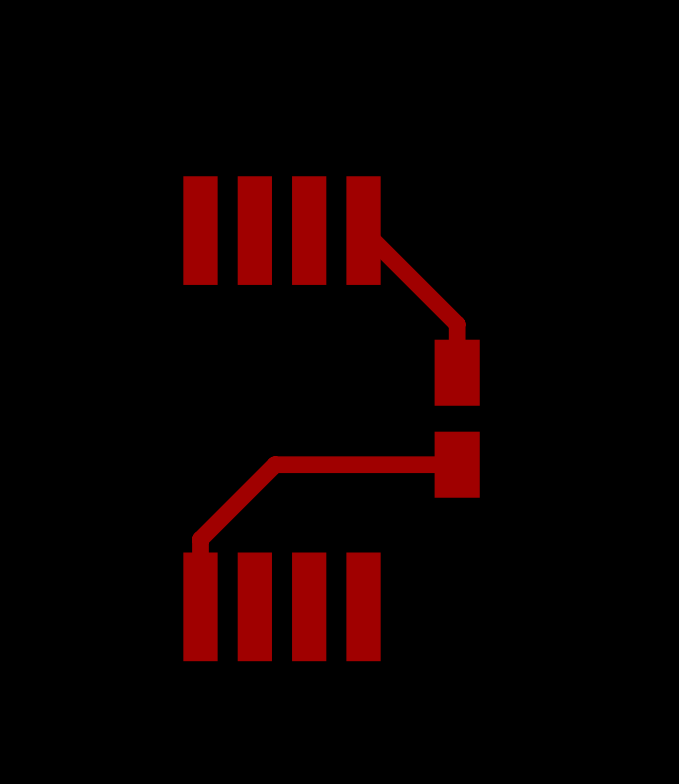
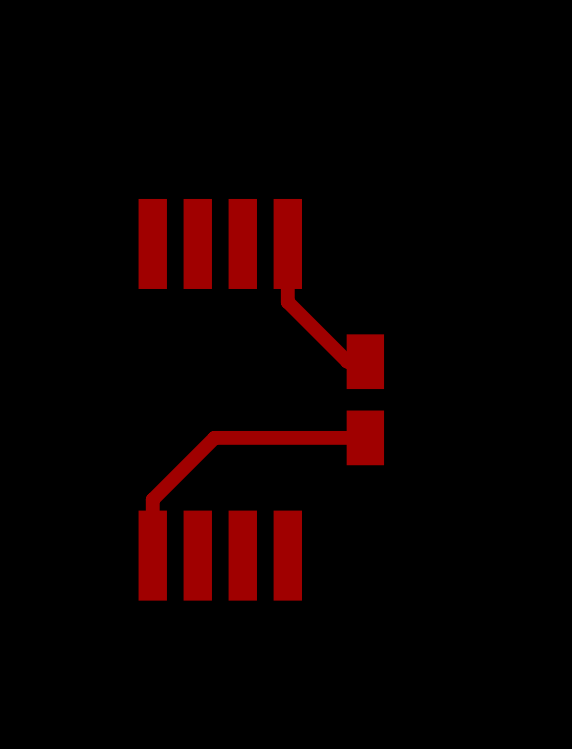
top track: (363, 230) (457, 324) (457, 372) -> (287, 243) (287, 302) (347, 361) (365, 361)

